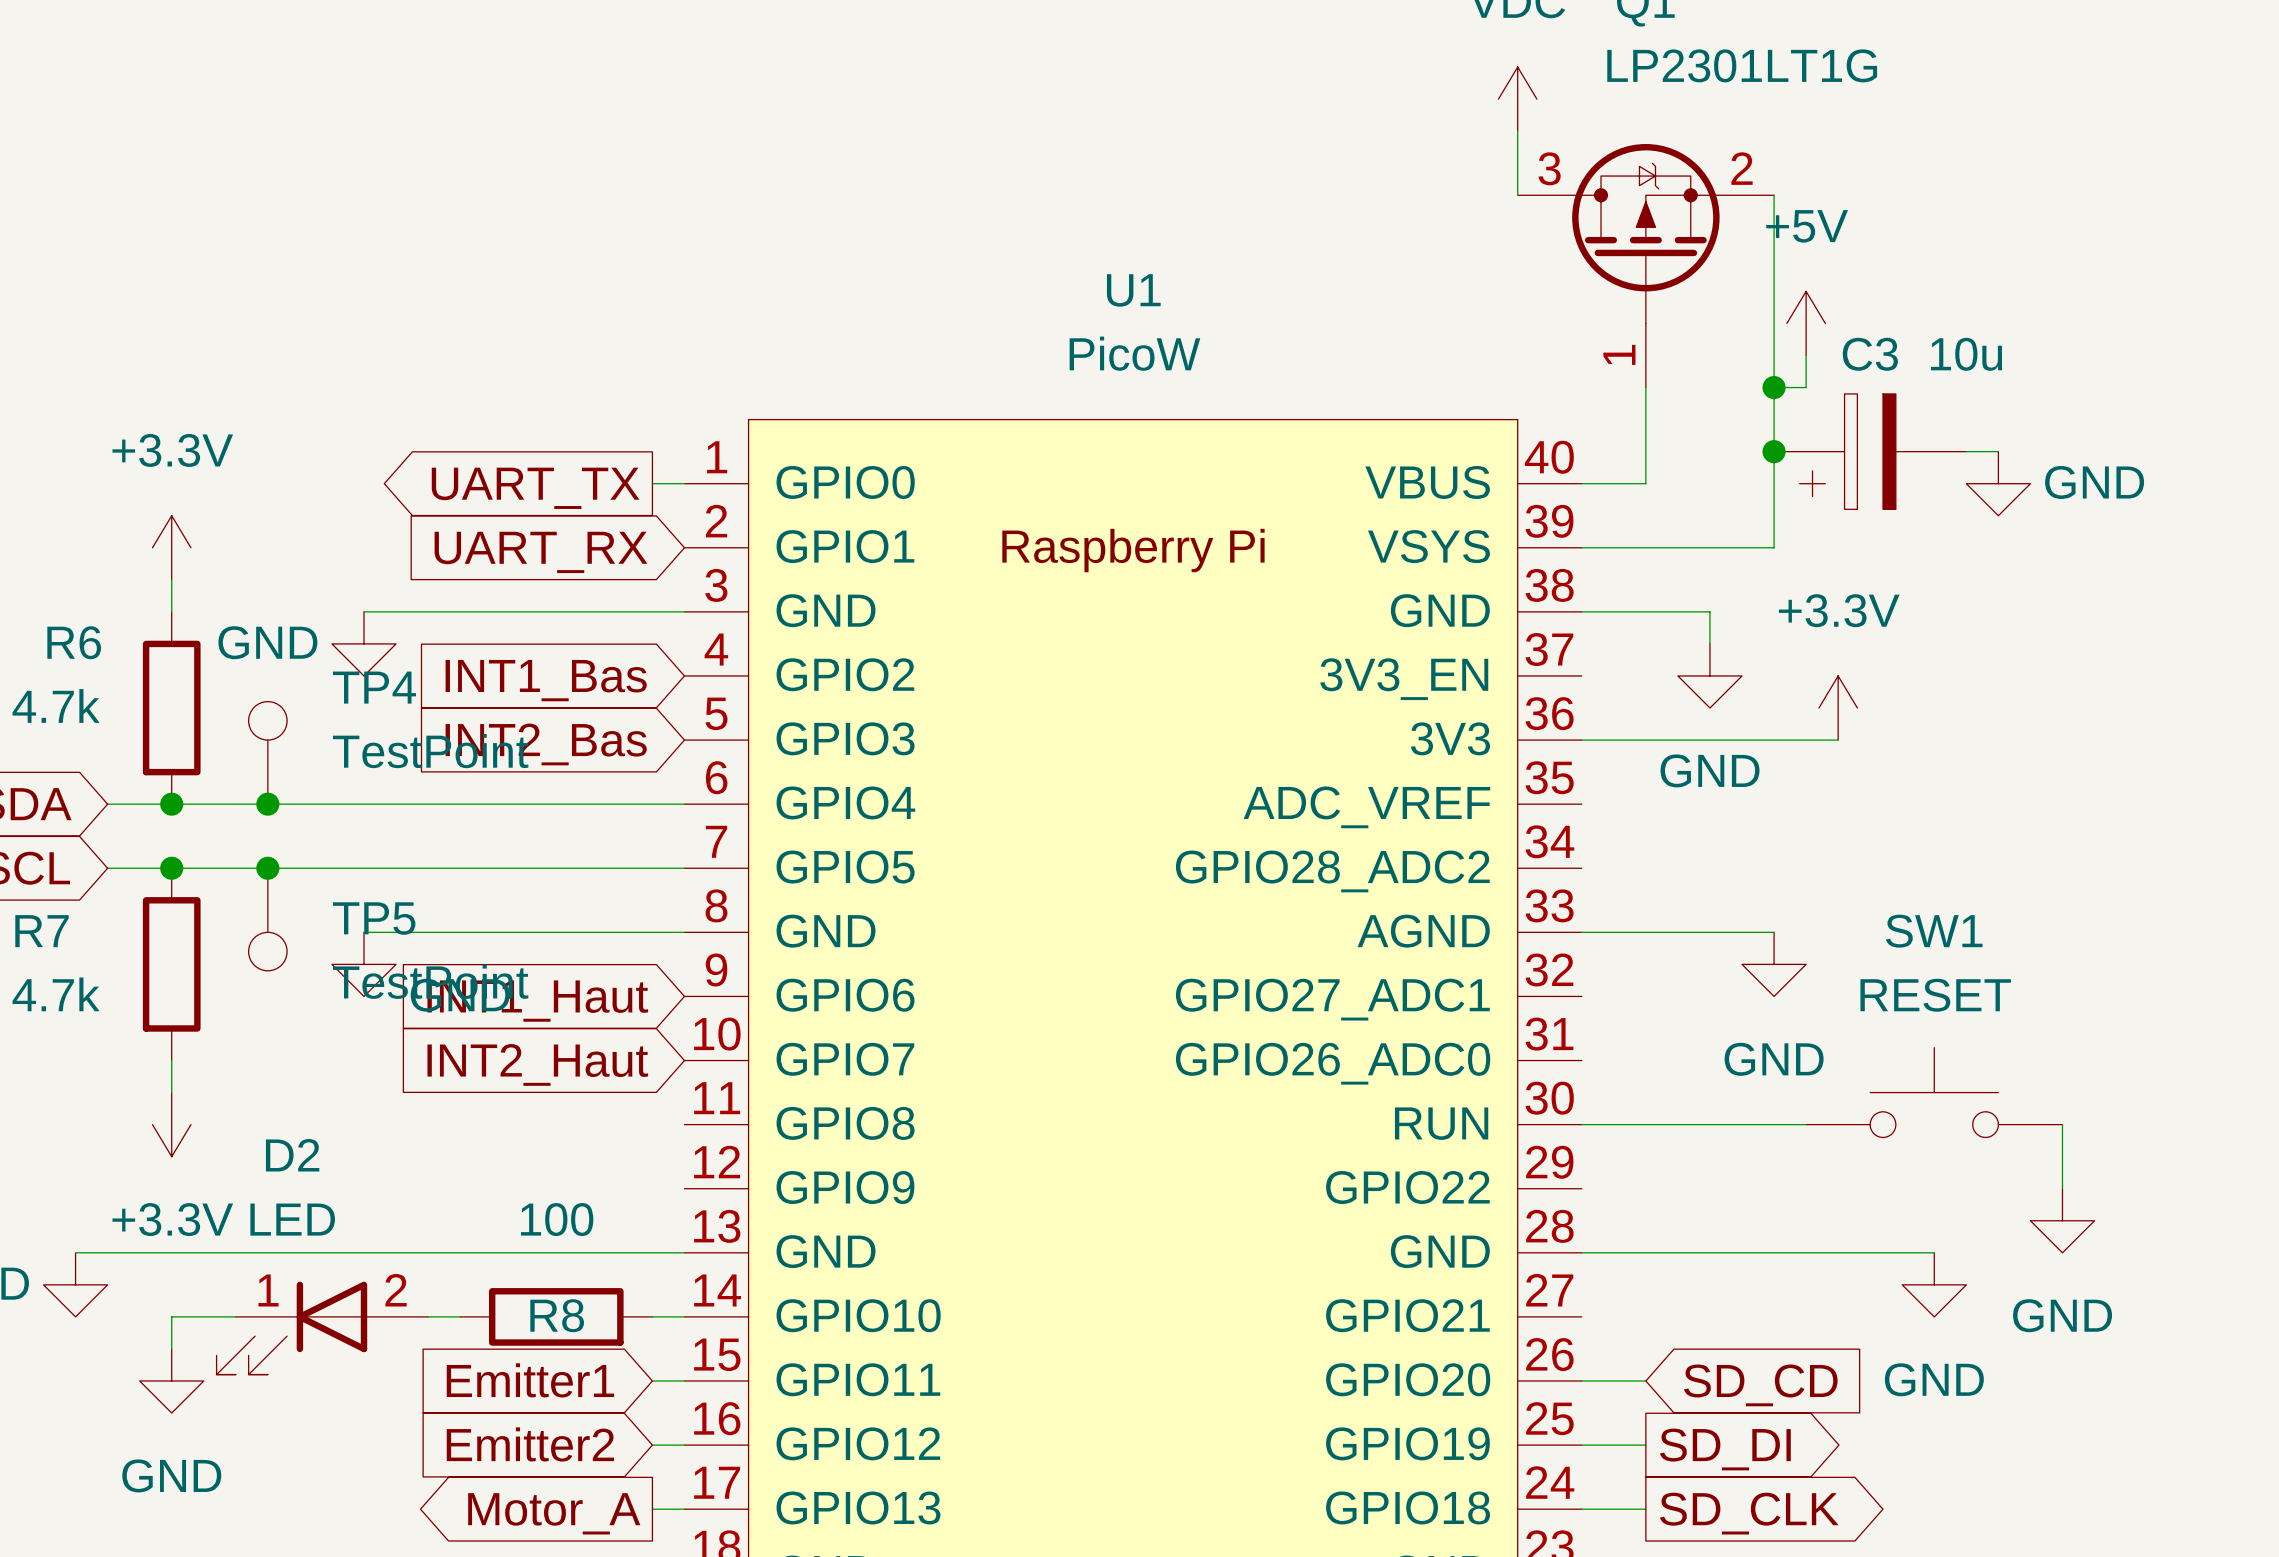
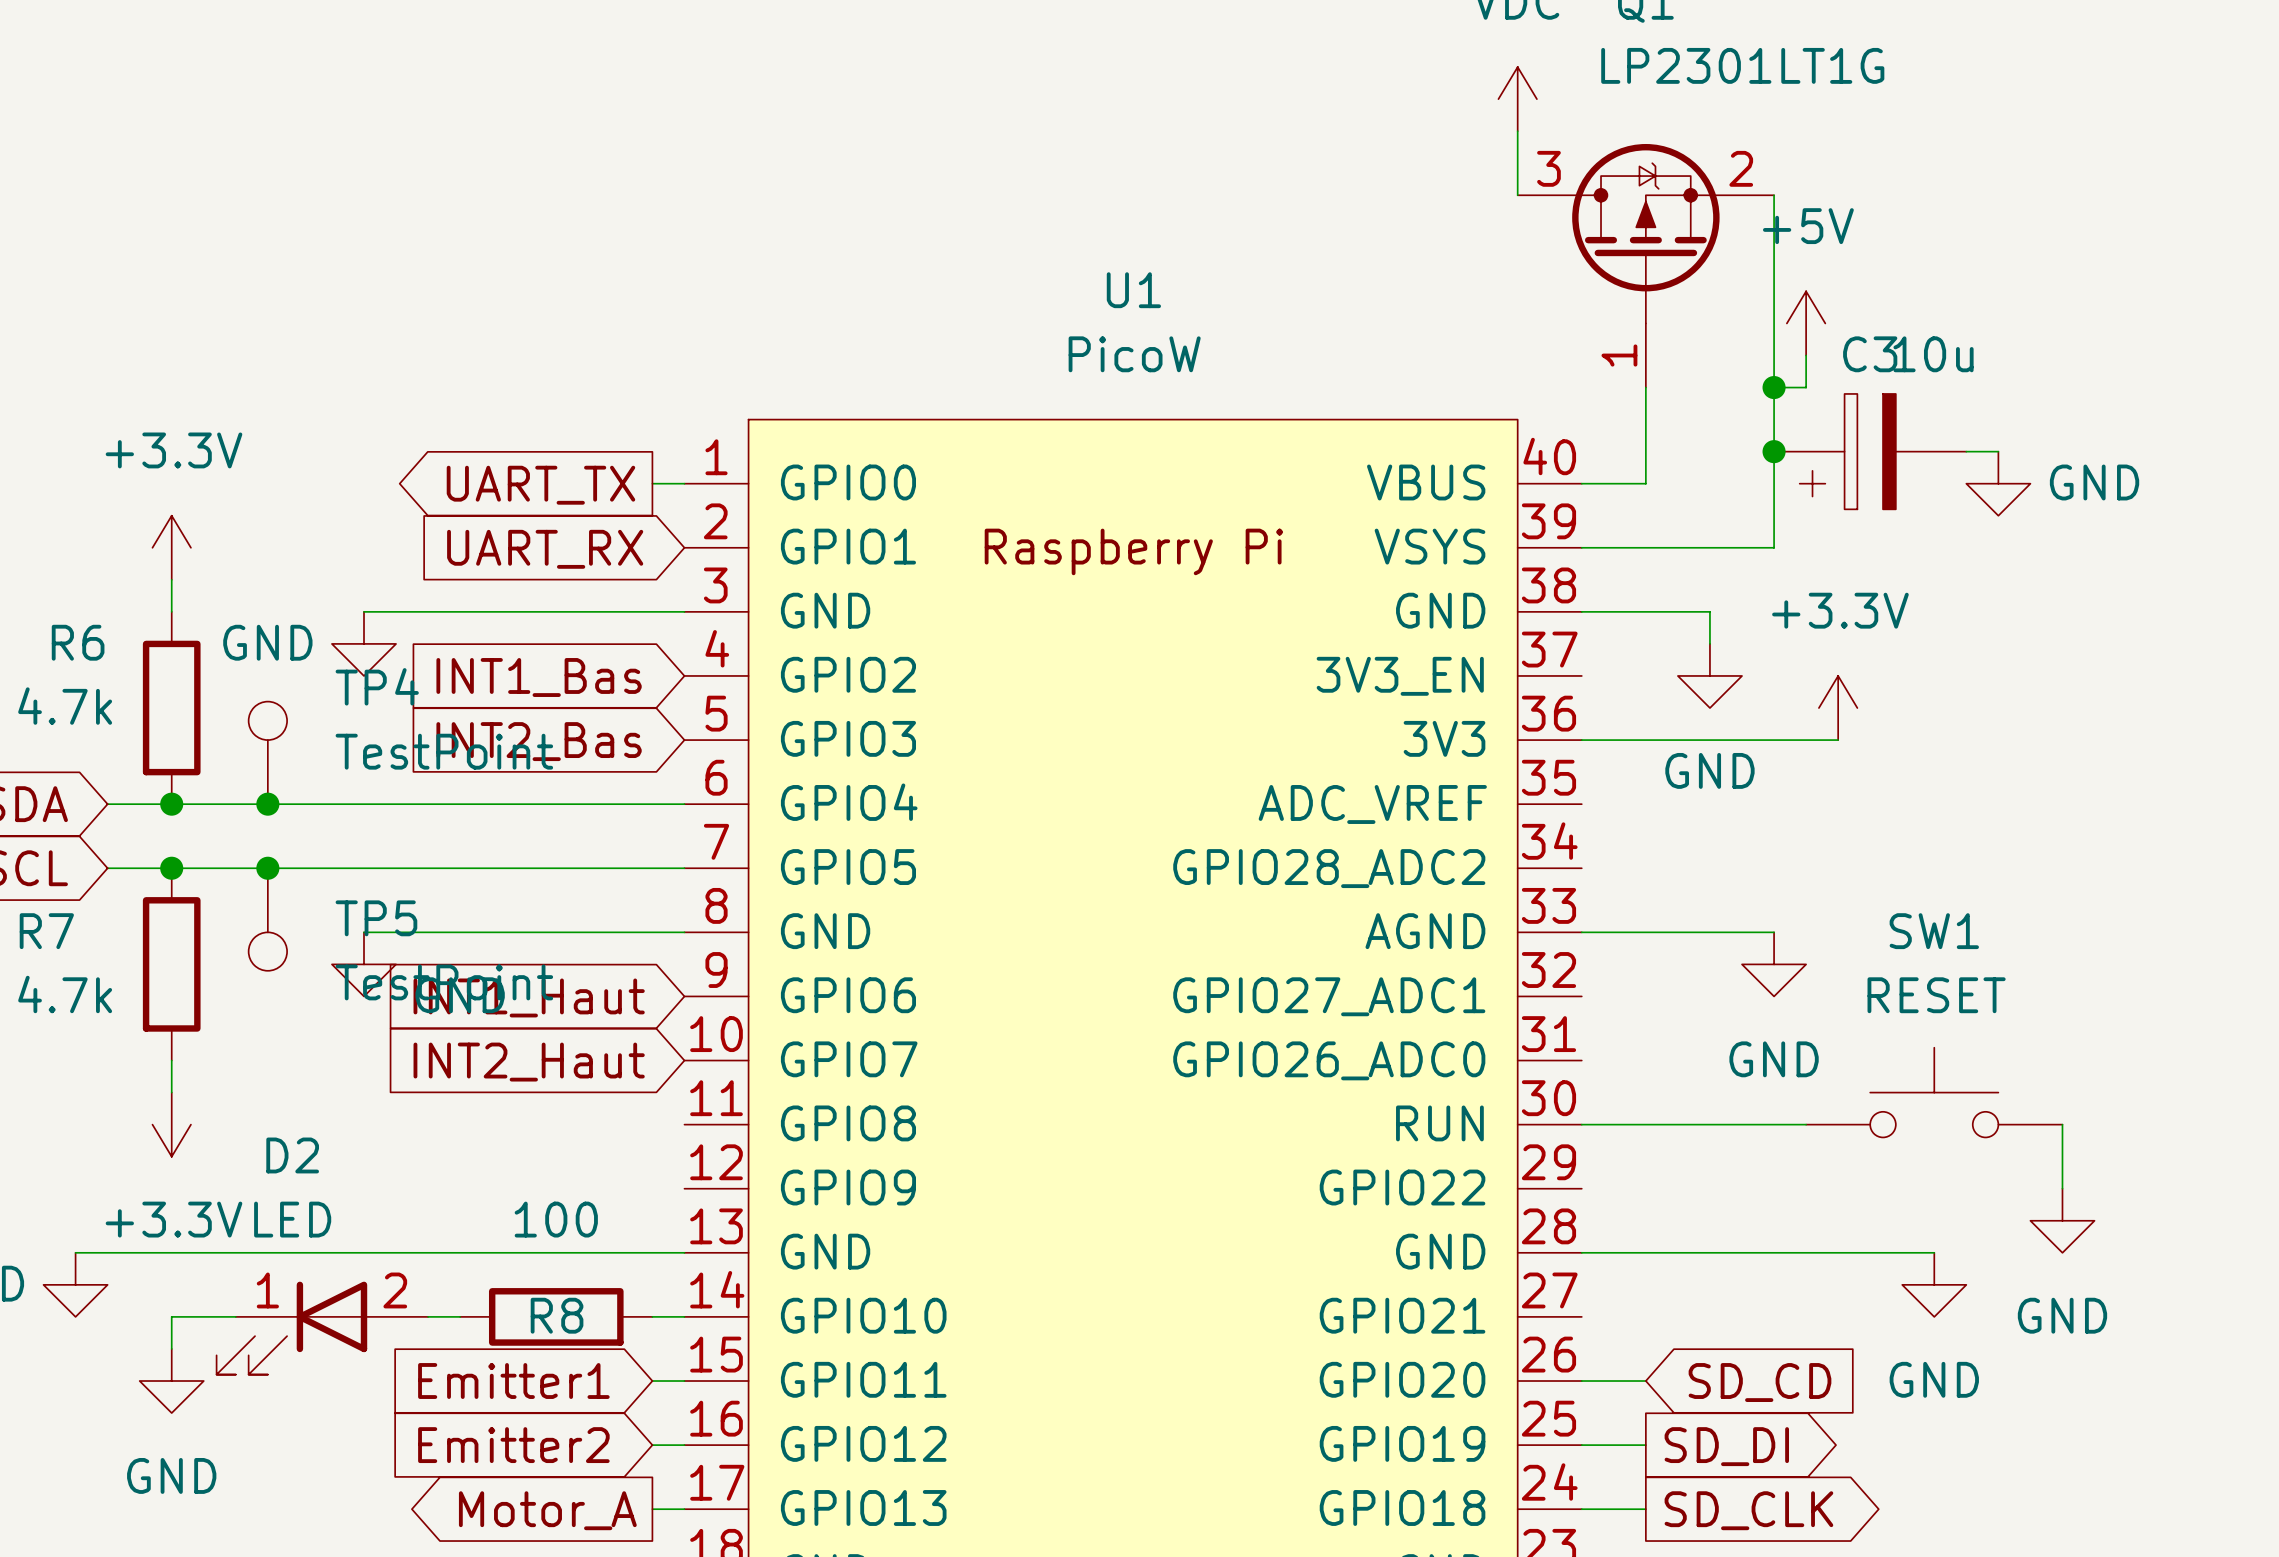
C3 value position: 10u (1966, 354) -> 10u (1933, 354)

